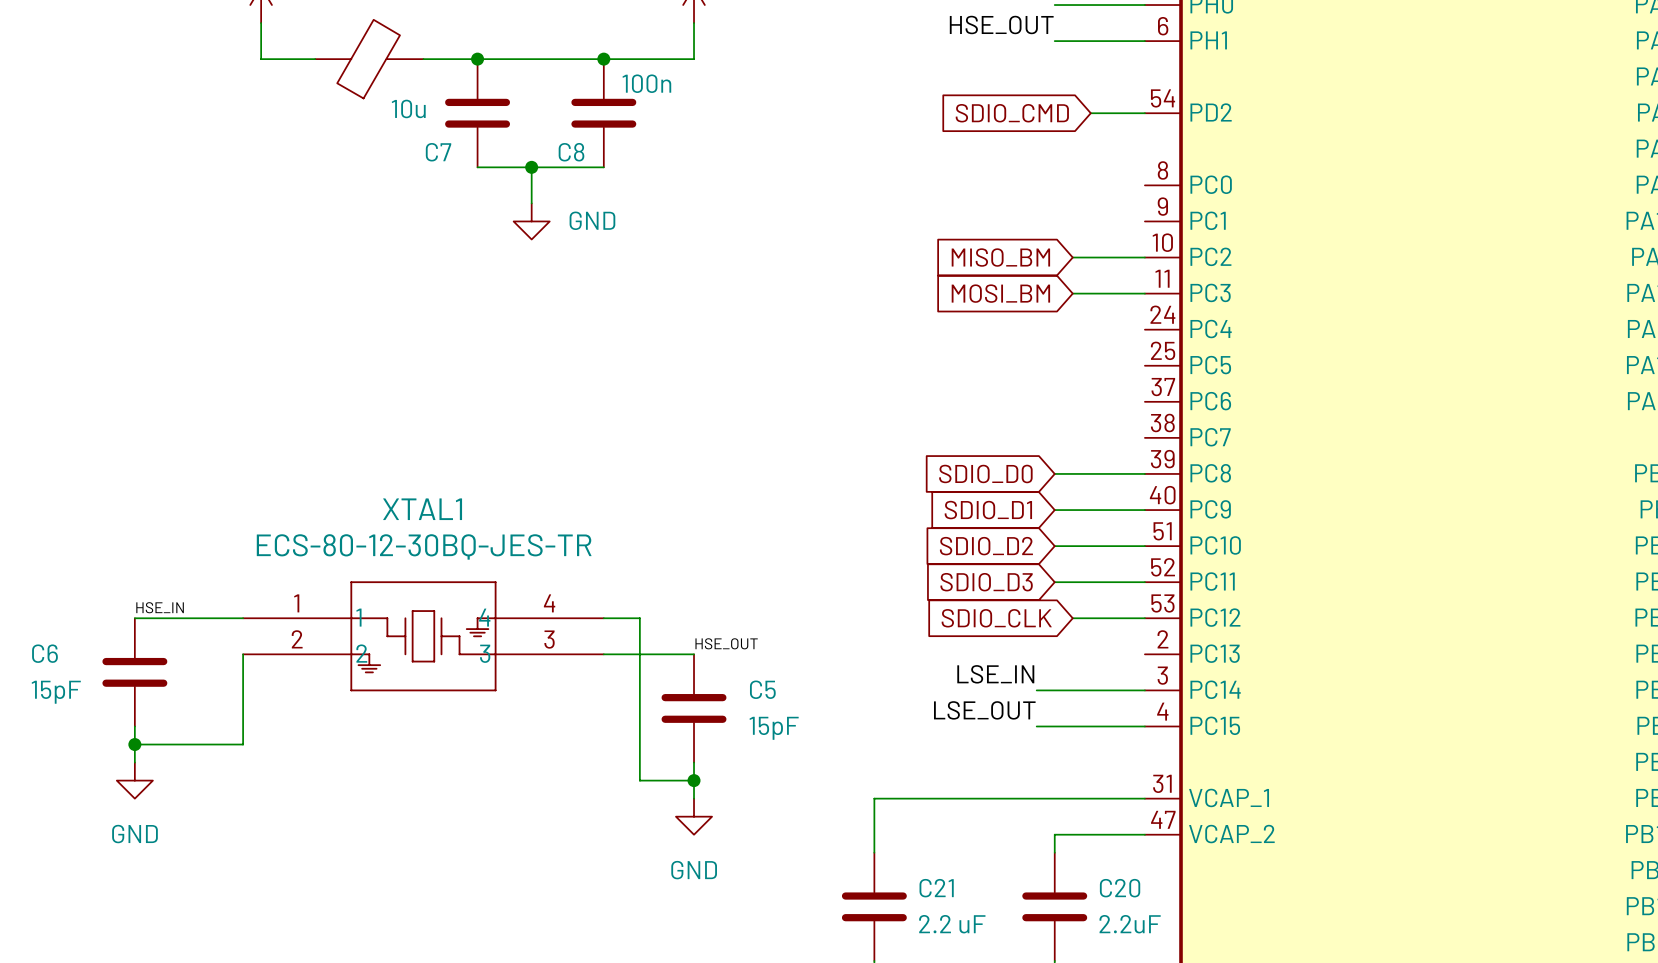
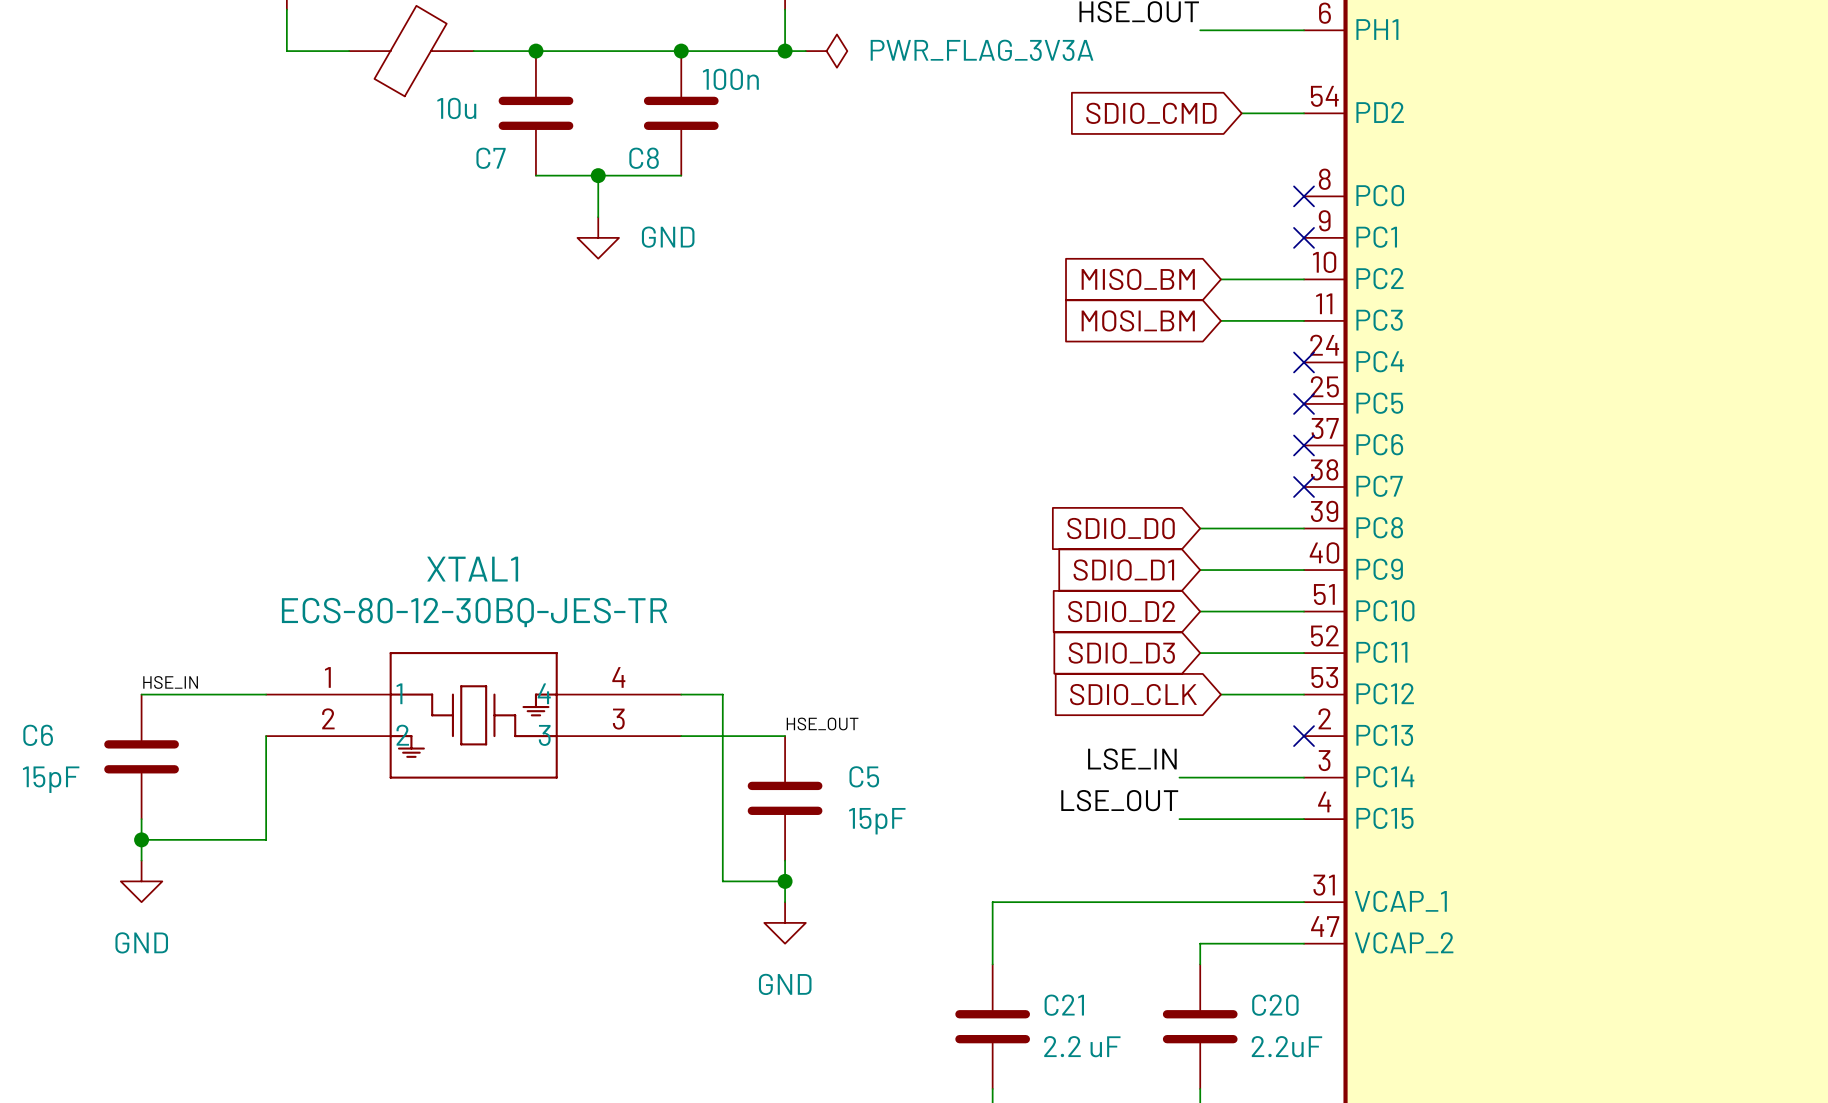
wire: none -> (785, 51) (805, 51)
junction: none -> (785, 51)
power symbol: none -> PWR_FLAG_3V3A (826, 51)
no-connect mark: none -> (1304, 196)
no-connect mark: none -> (1304, 237)
no-connect mark: none -> (1304, 362)
no-connect mark: none -> (1304, 403)
no-connect mark: none -> (1304, 445)
no-connect mark: none -> (1304, 486)
no-connect mark: none -> (1304, 736)

